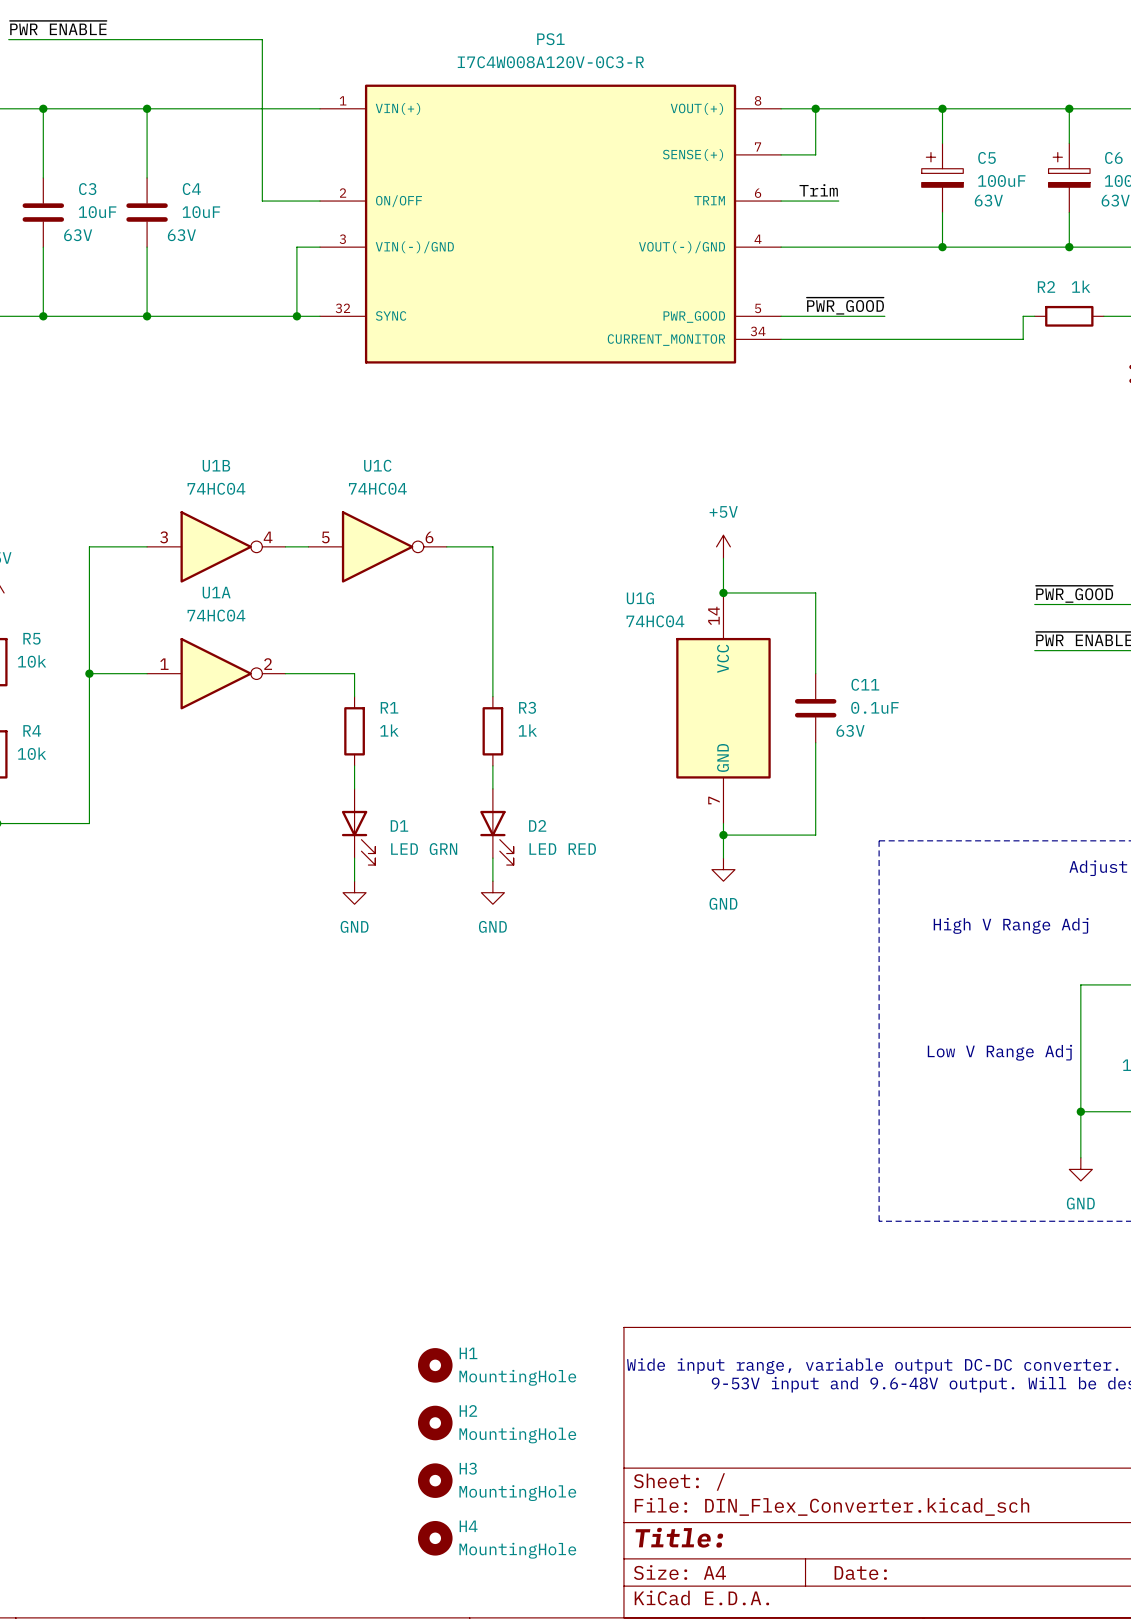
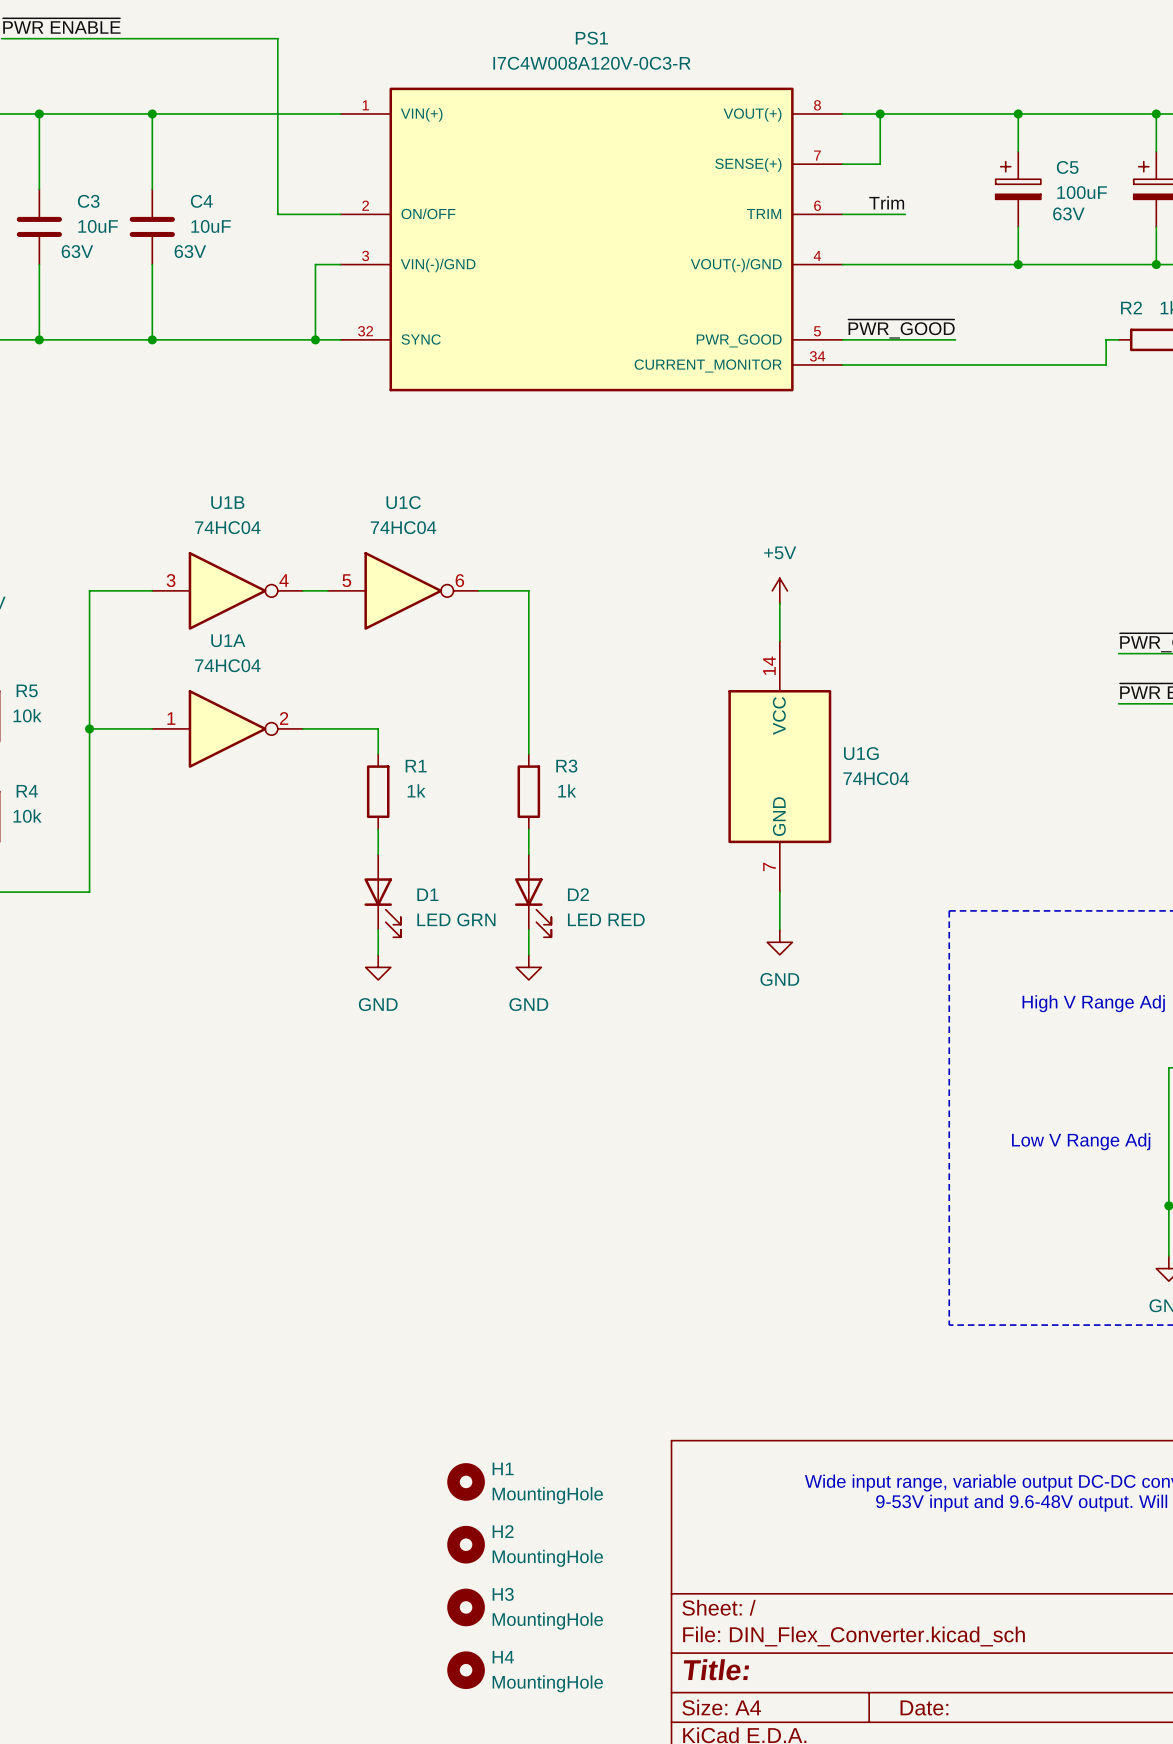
wire: (723, 592) (815, 592) (815, 673) -> none
junction: (723, 592) -> none
U1G name position: U1G (640, 598) -> U1G (861, 753)
U1G value position: 74HC04 (655, 621) -> 74HC04 (876, 778)
C11: 0.1uF (815, 708) -> none
wire: (815, 742) (815, 835) (723, 835) -> none
junction: (723, 835) -> none

